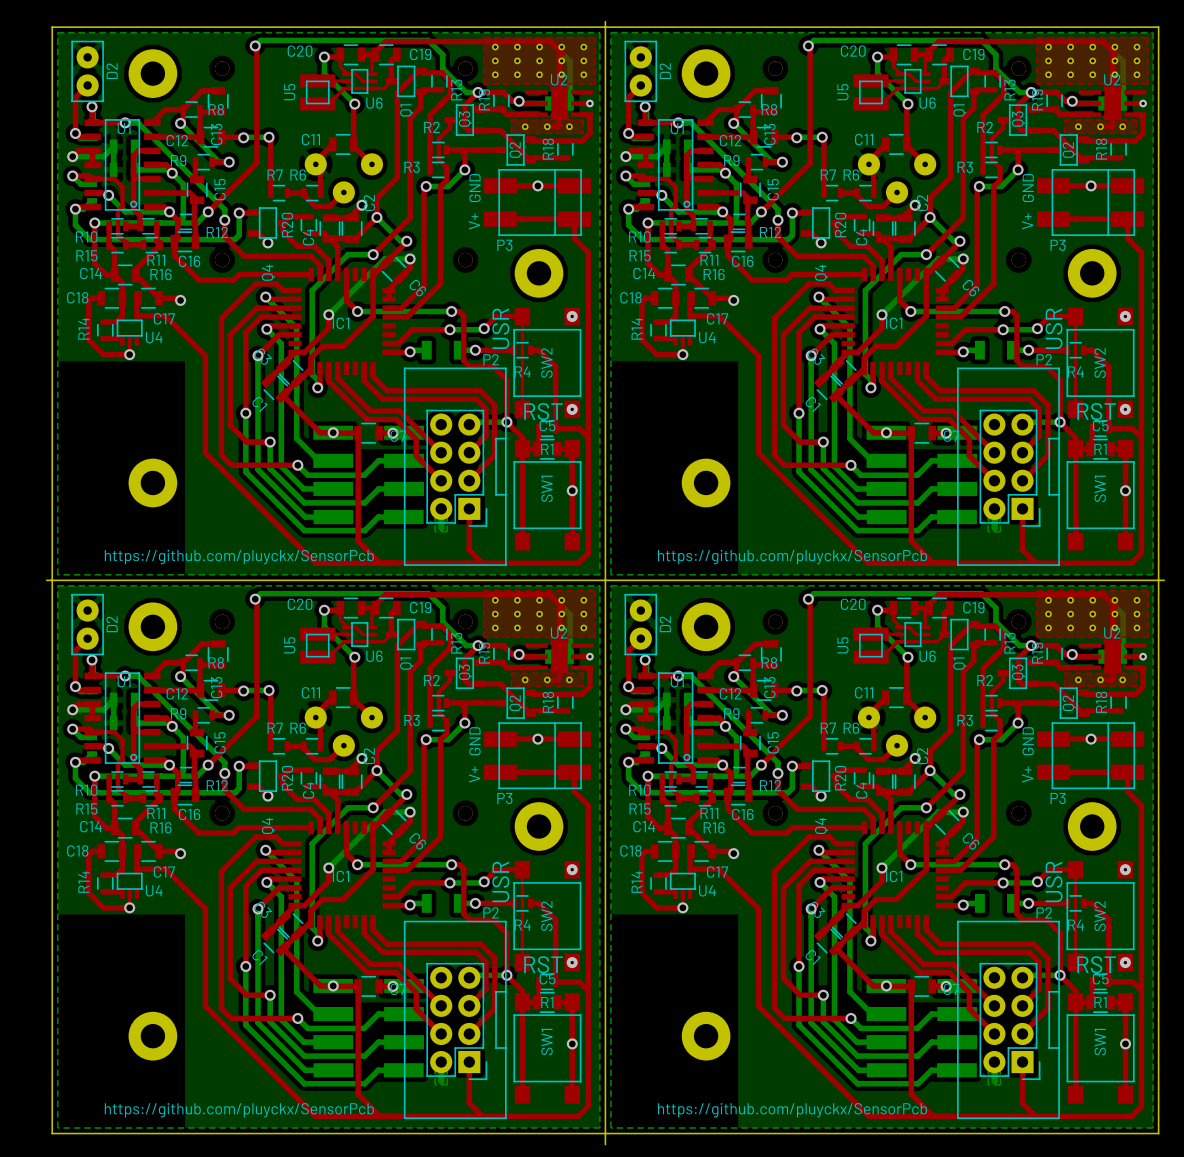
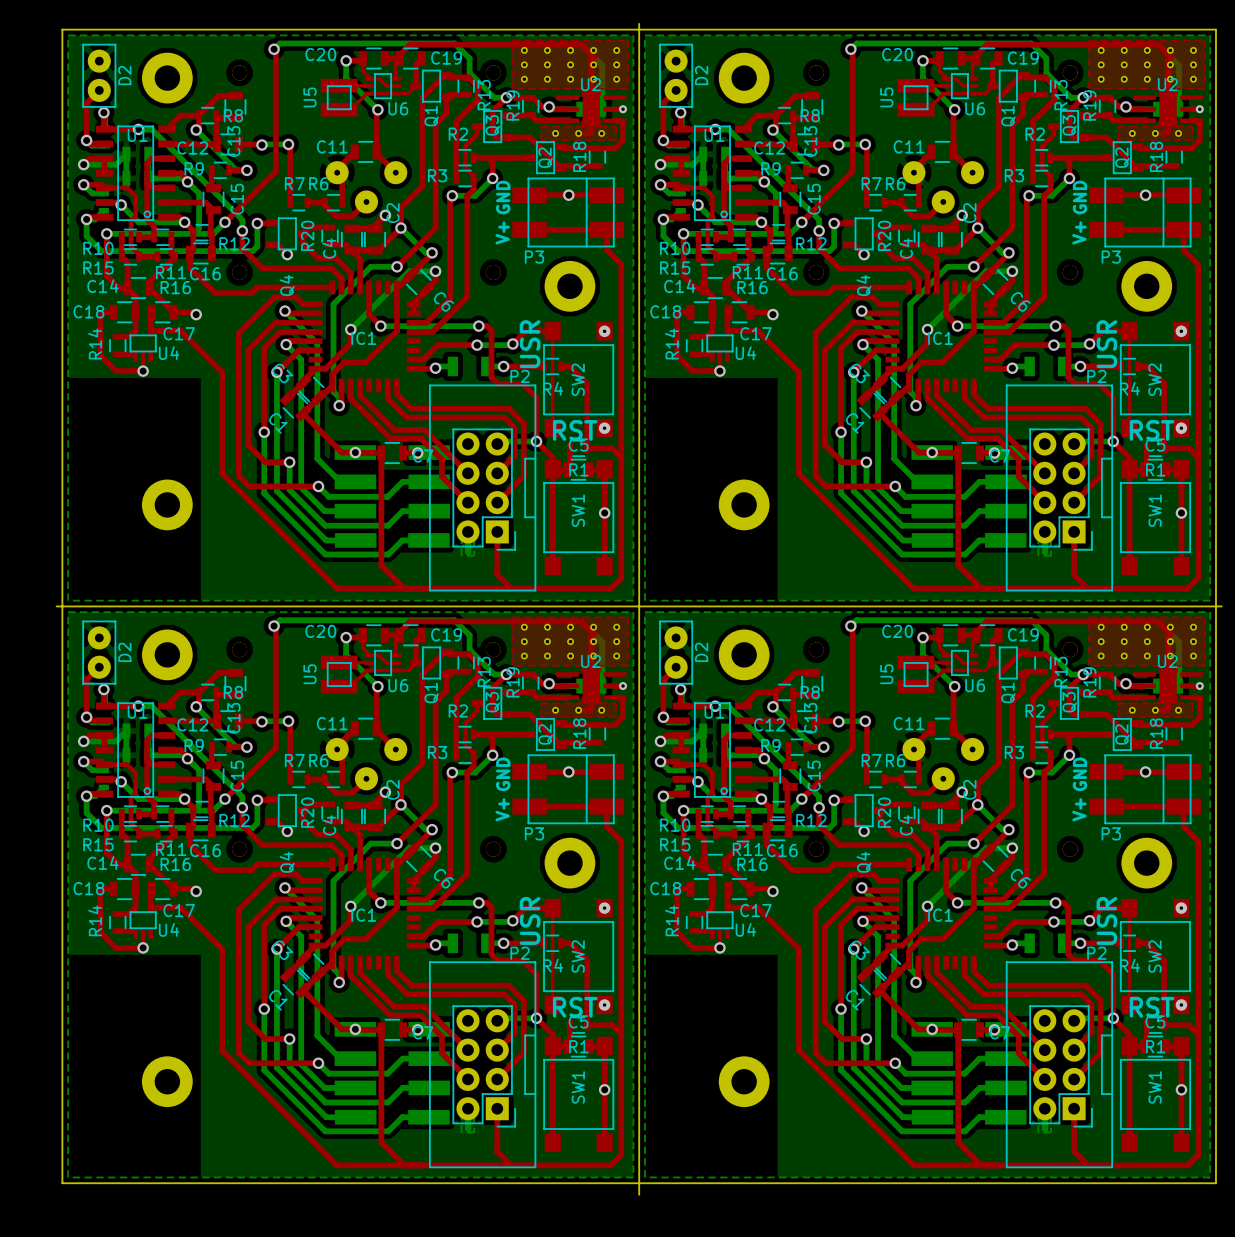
text: https://github.com/pluyckx/SensorPcb (239, 557) -> none
text: https://github.com/pluyckx/SensorPcb (792, 557) -> none
text: https://github.com/pluyckx/SensorPcb (239, 1110) -> none
text: https://github.com/pluyckx/SensorPcb (792, 1110) -> none

